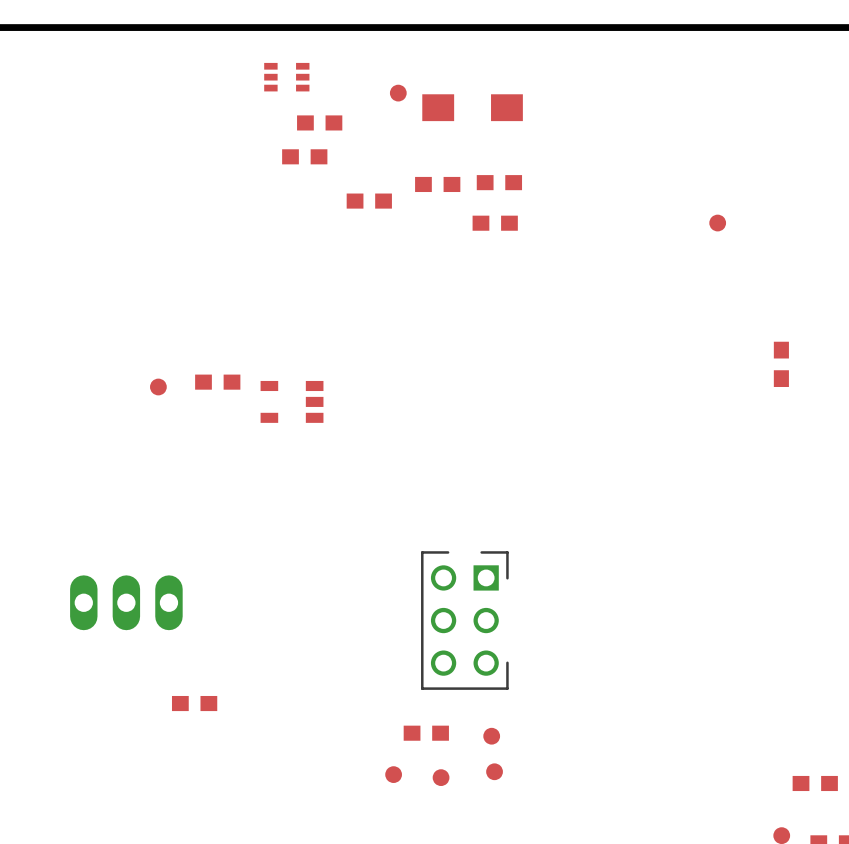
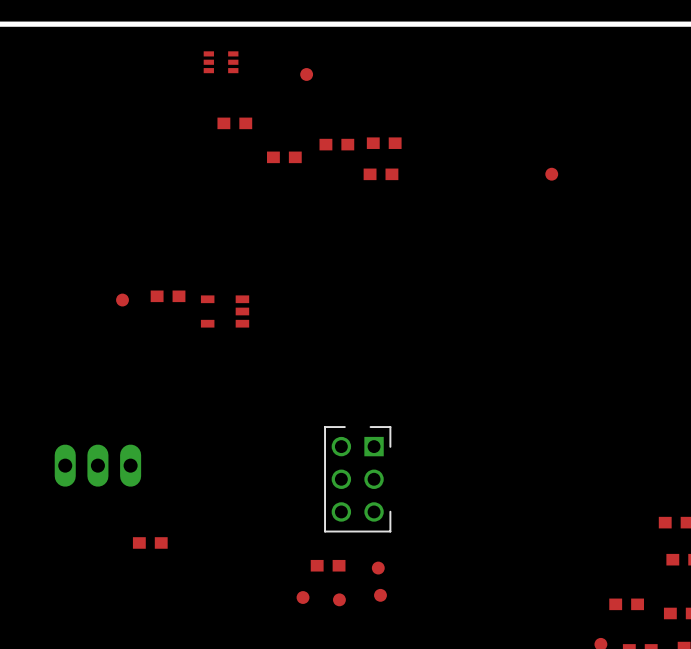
part: (472, 107) -> none
part: (319, 122) -> none
part: (781, 364) -> none

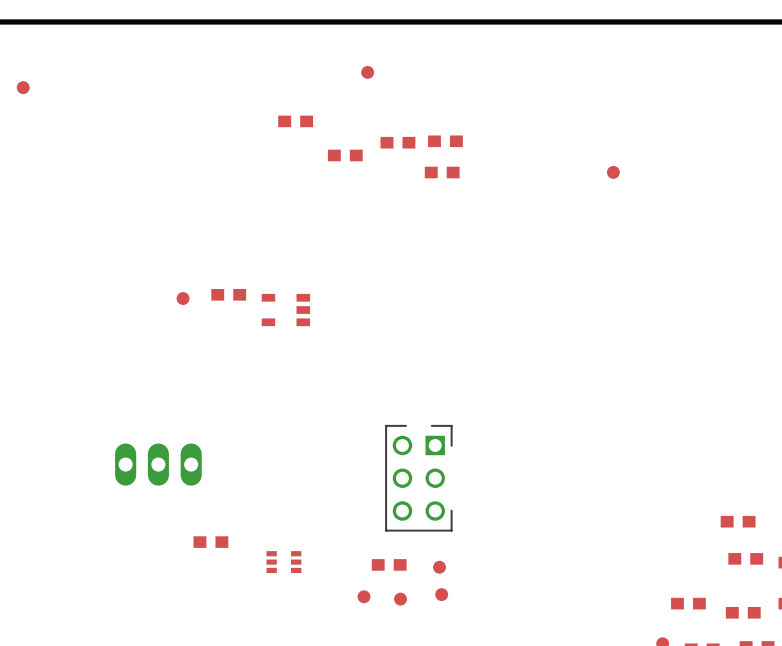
part: (221, 62) -> none
part: none -> (283, 562)

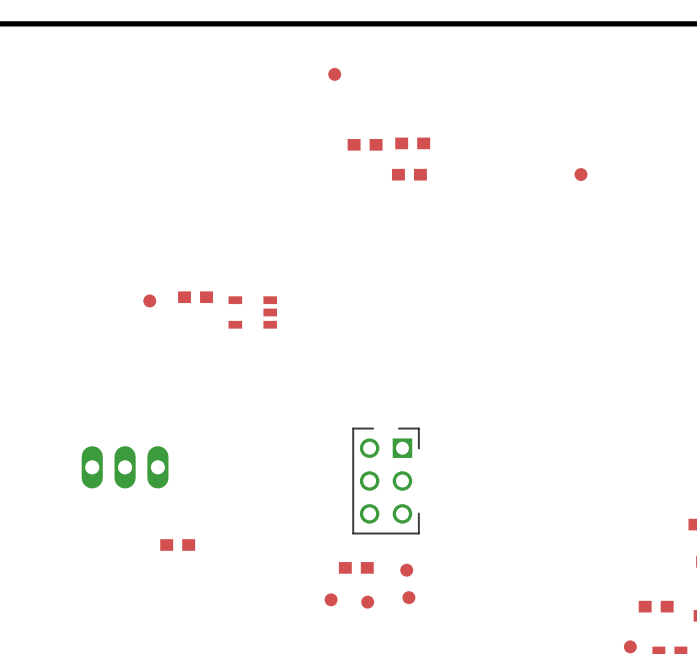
part: (295, 121) -> none
part: (345, 155) -> none
part: (283, 562) -> none

